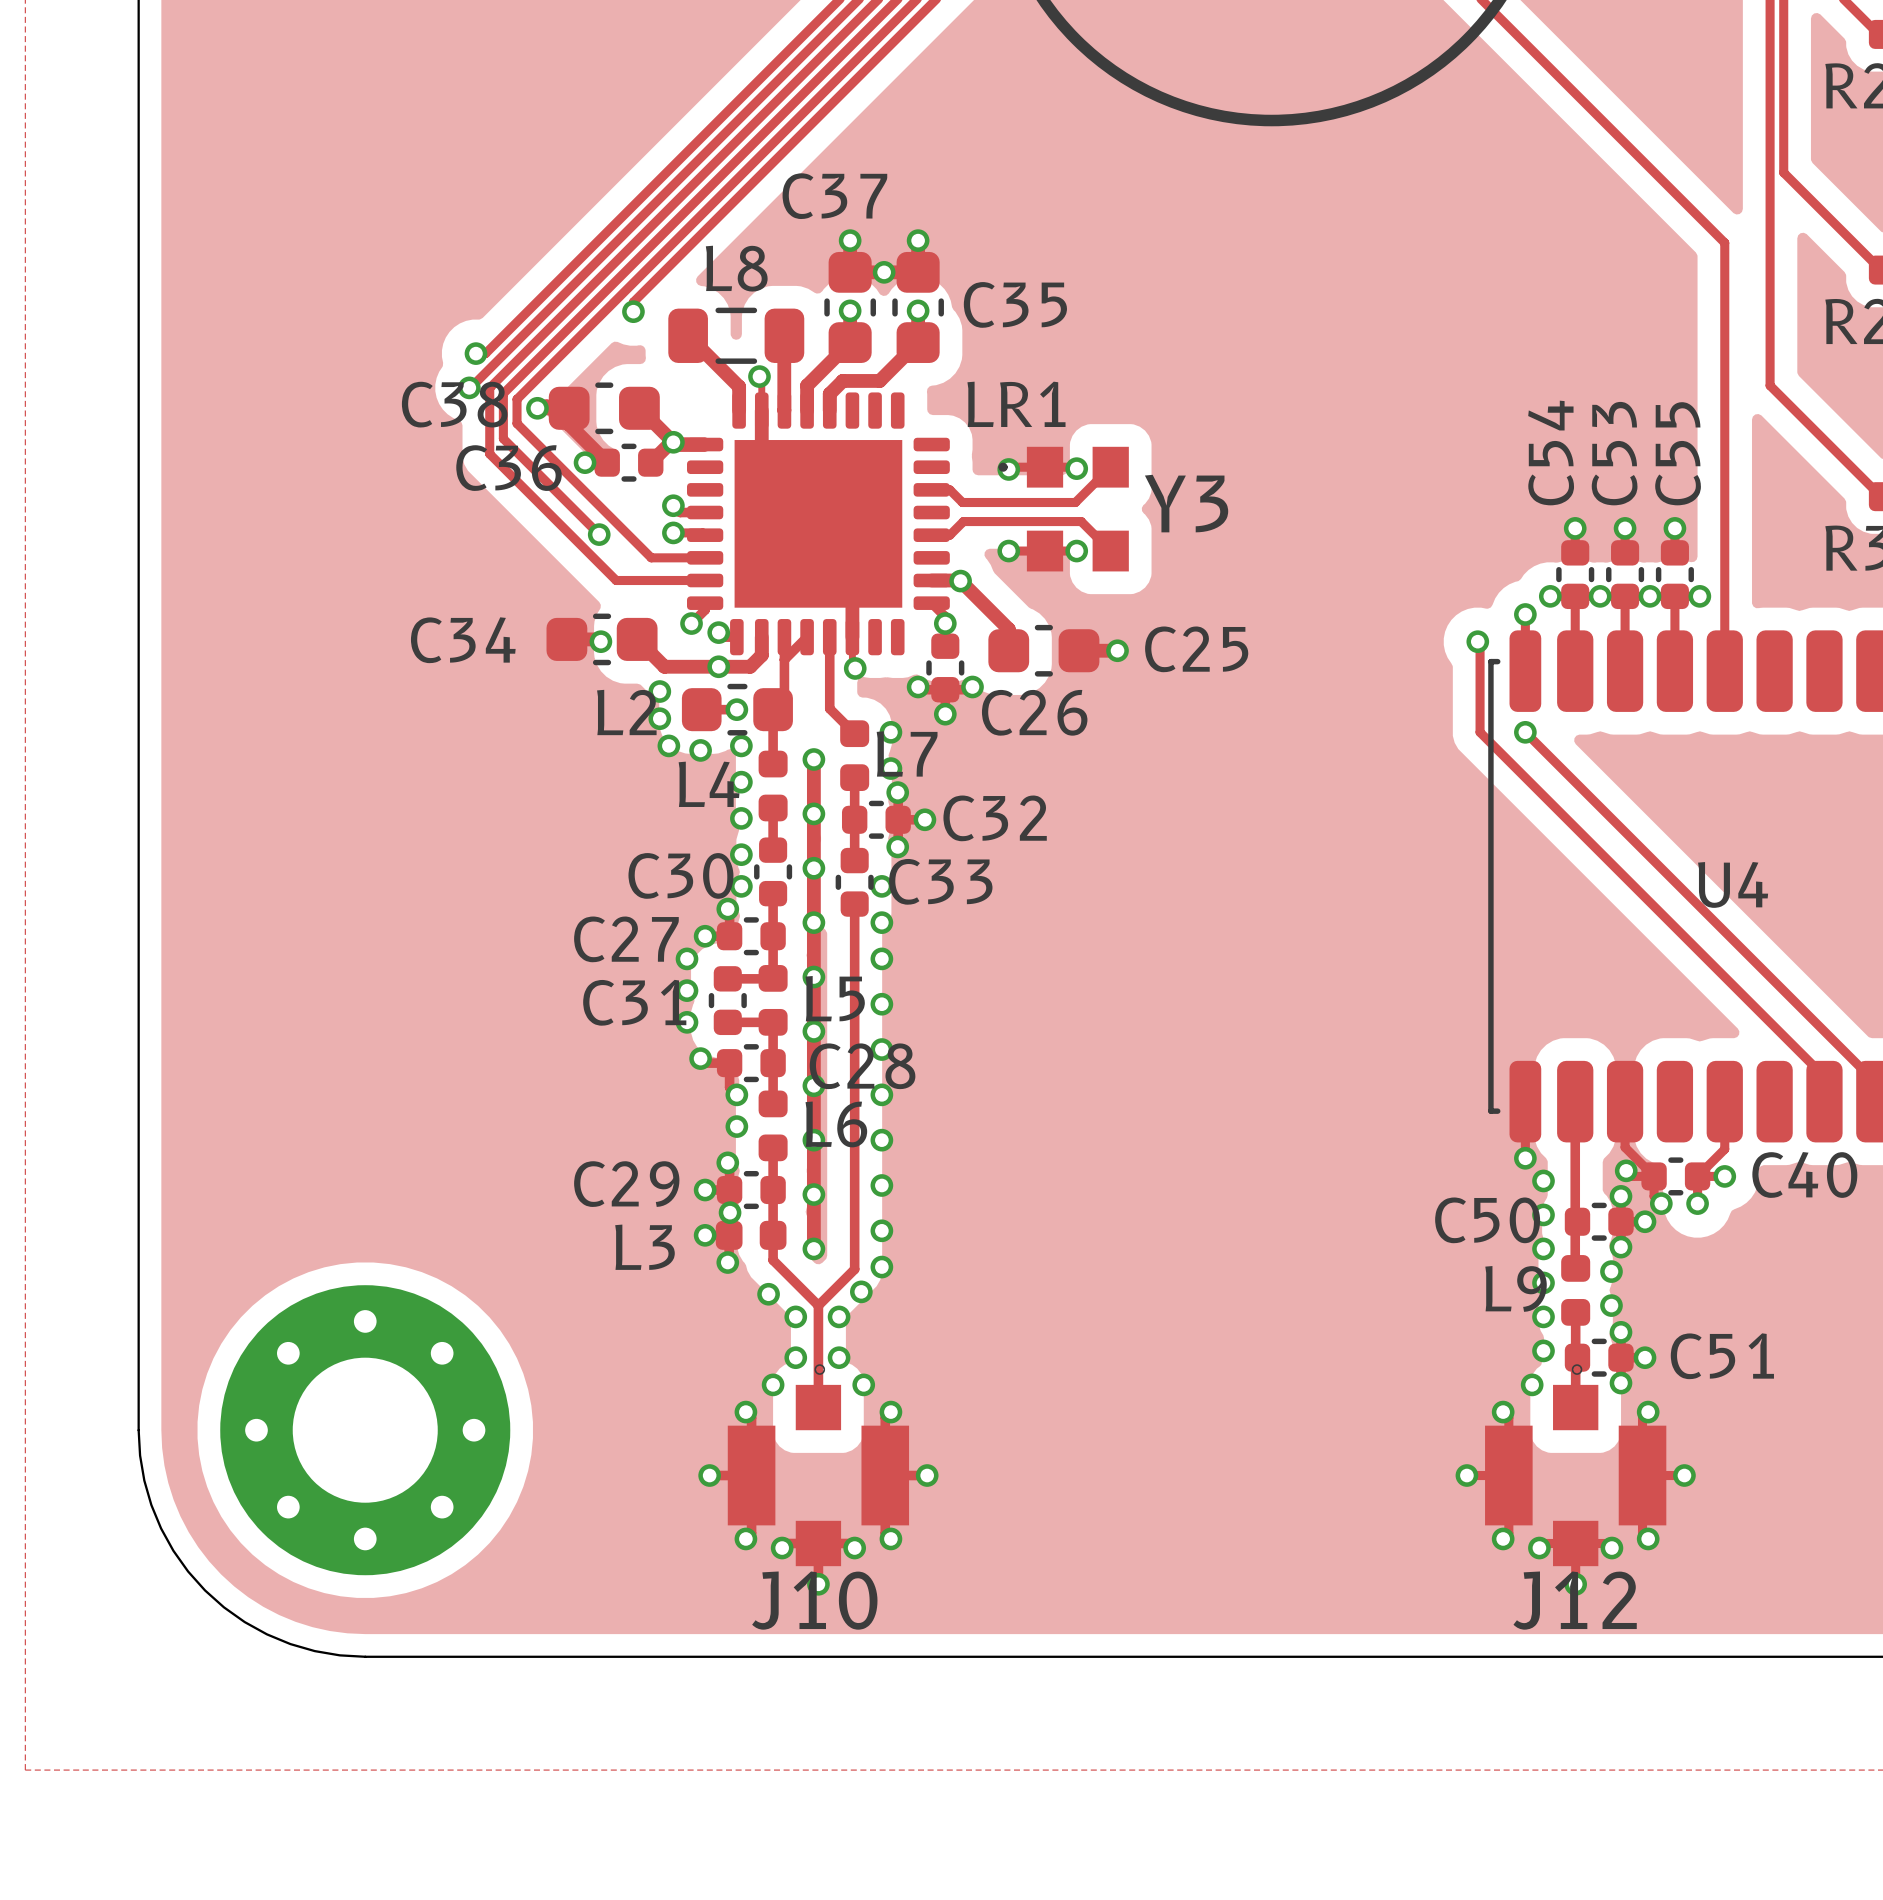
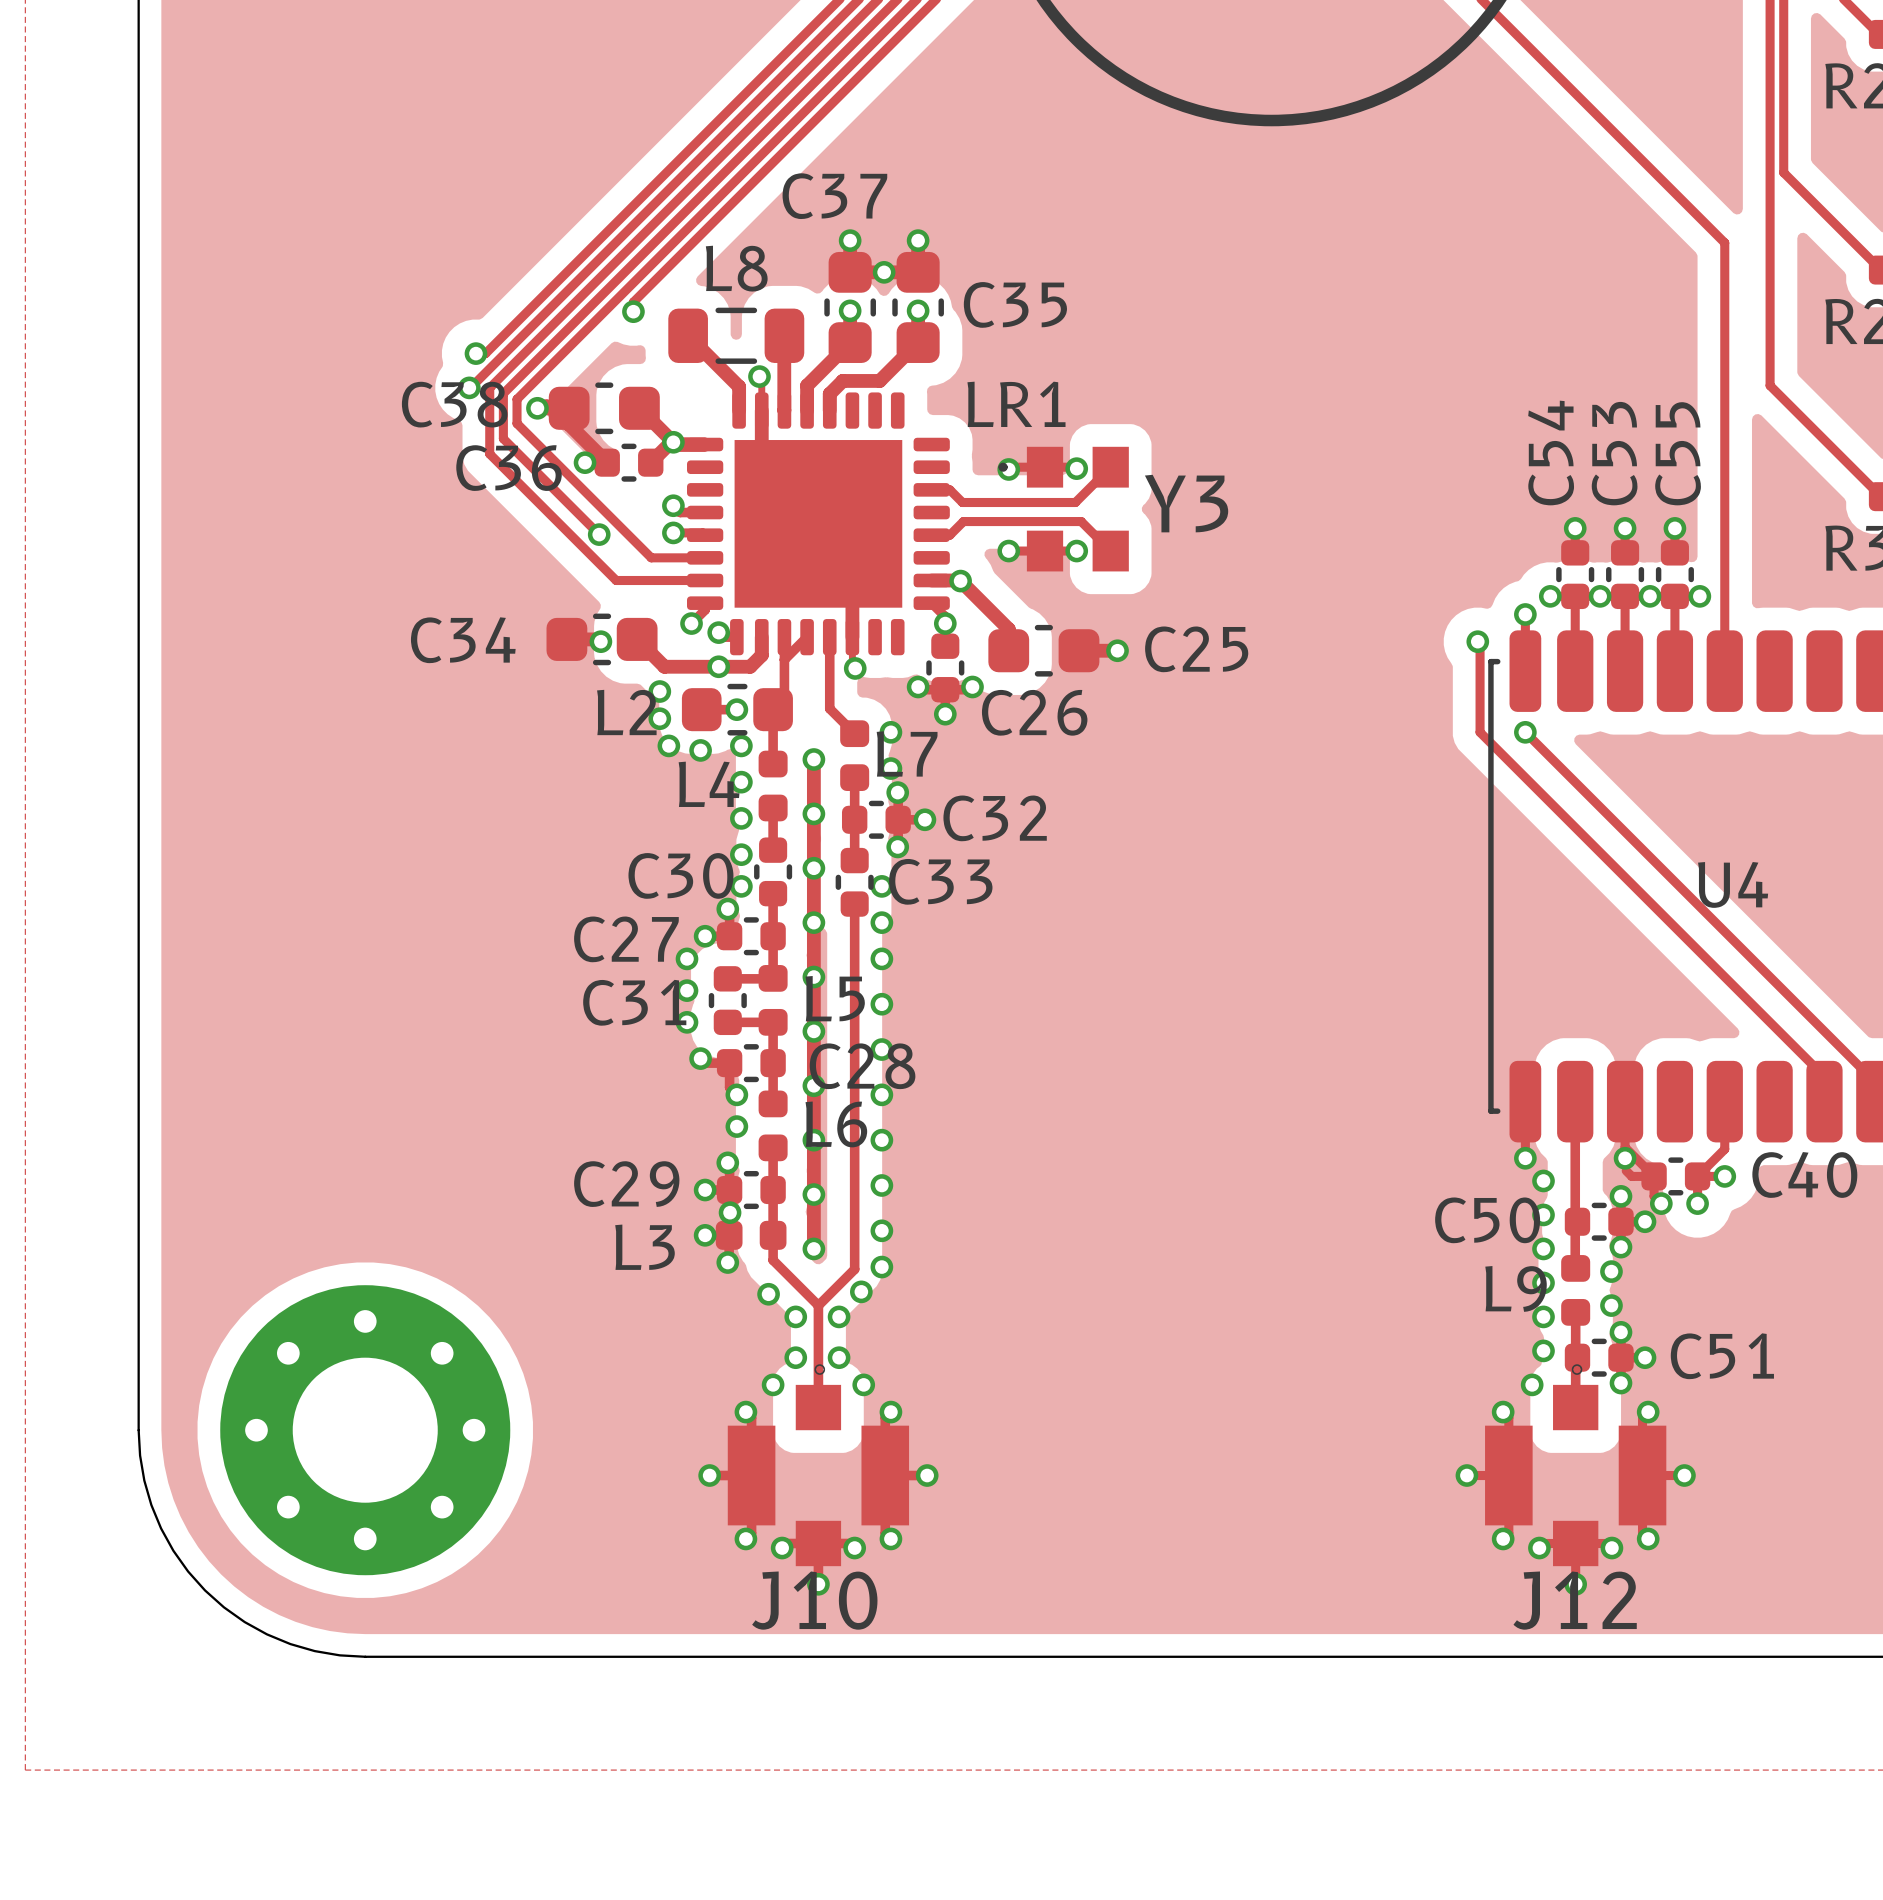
via position: (1626, 1170) -> (1625, 1158)

